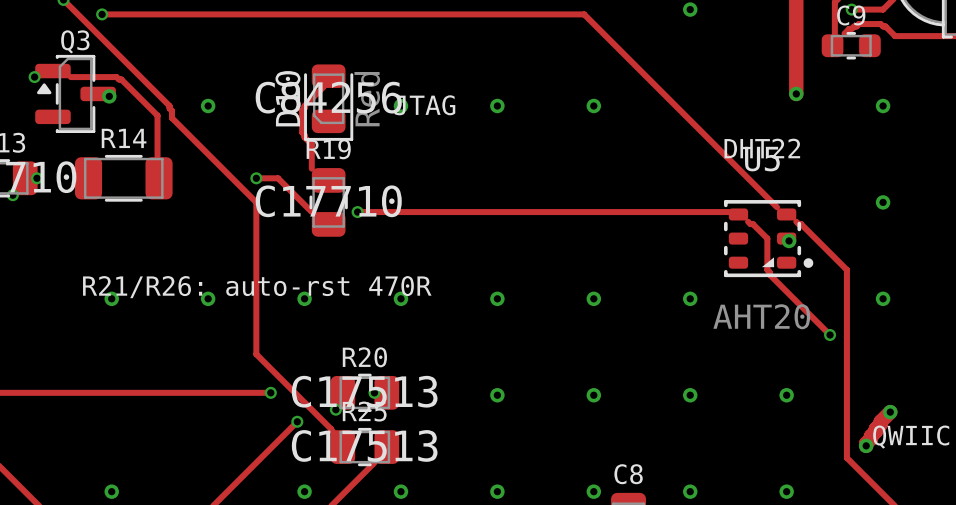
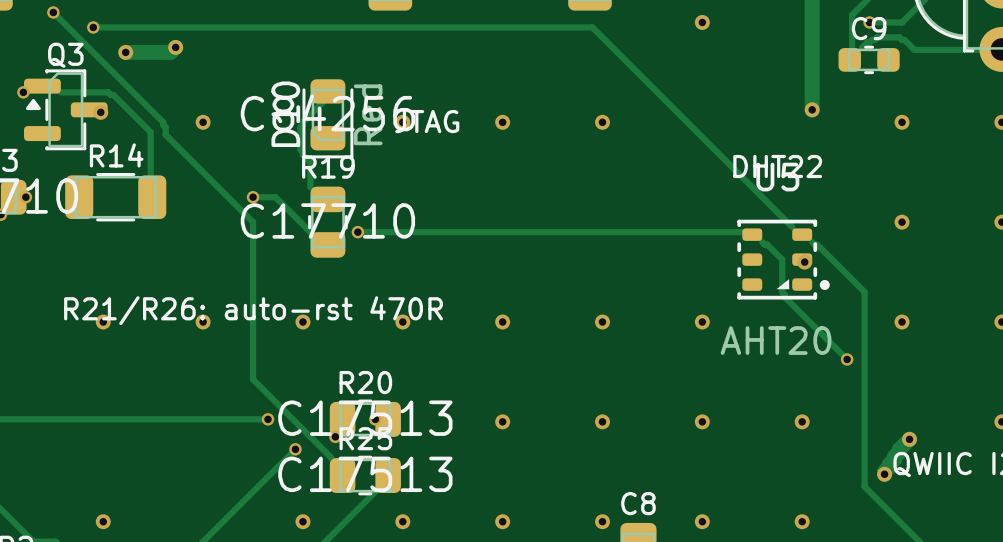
track: none -> (175, 47) (170, 52) (125, 52)
via: none -> (175, 47)
via: none -> (125, 52)

